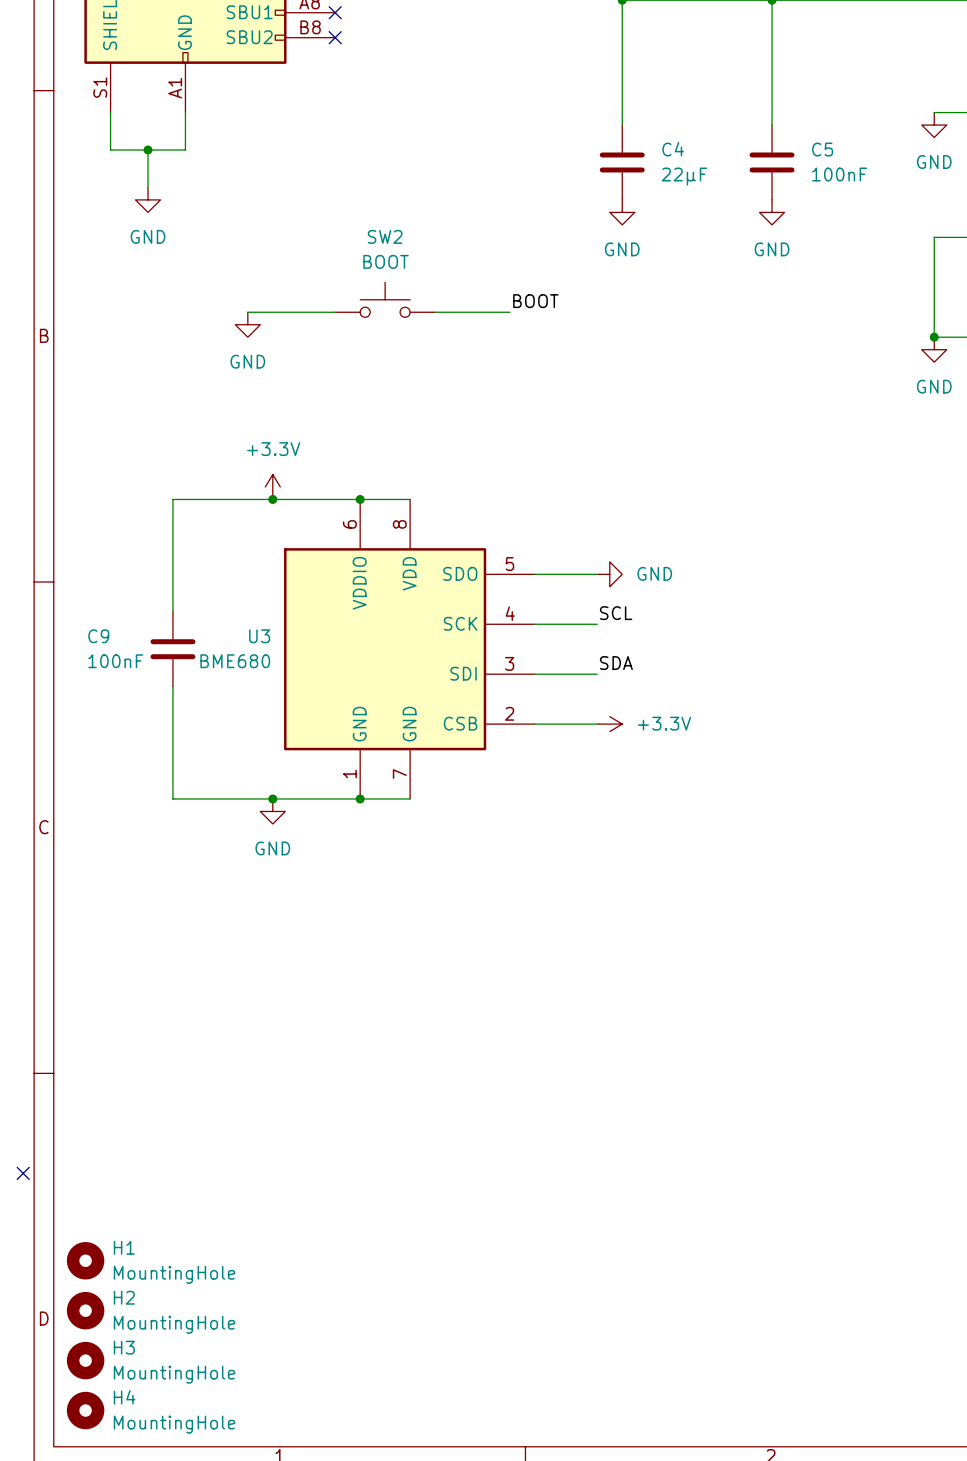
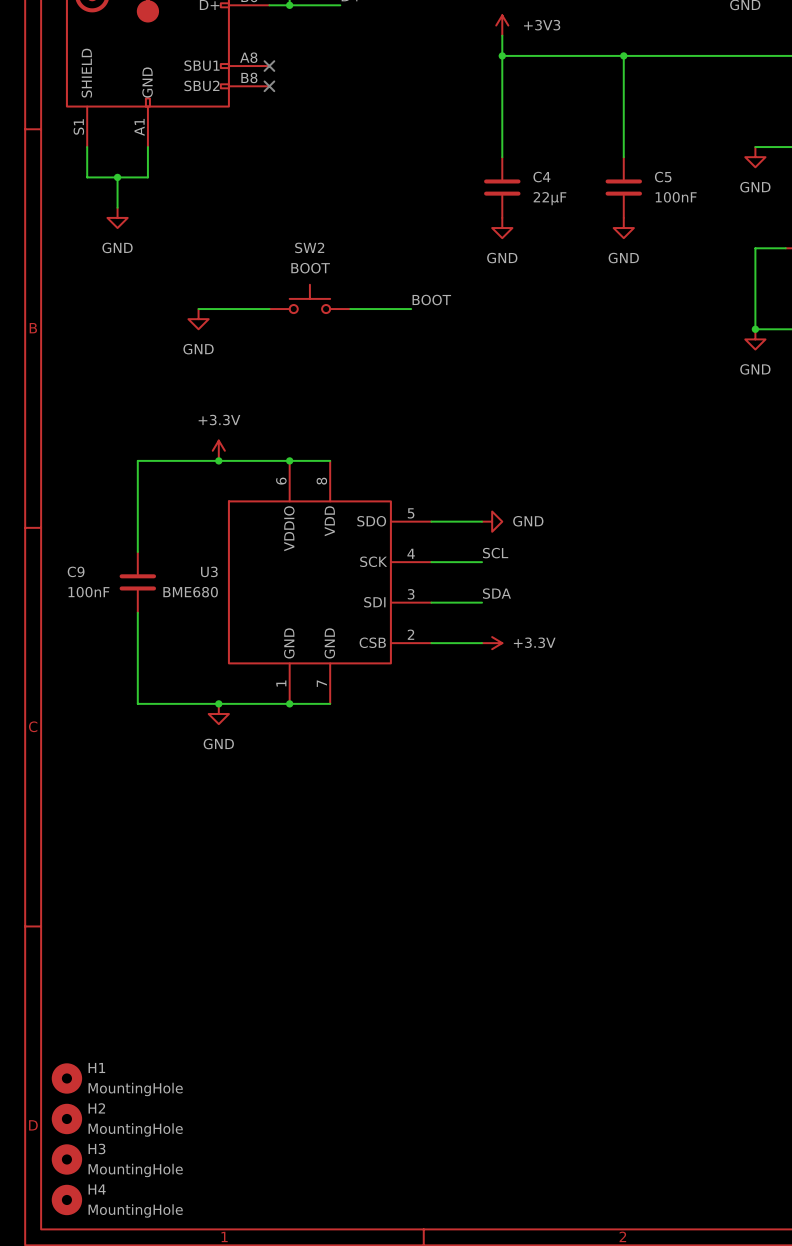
no-connect mark: (23, 1173) -> none

